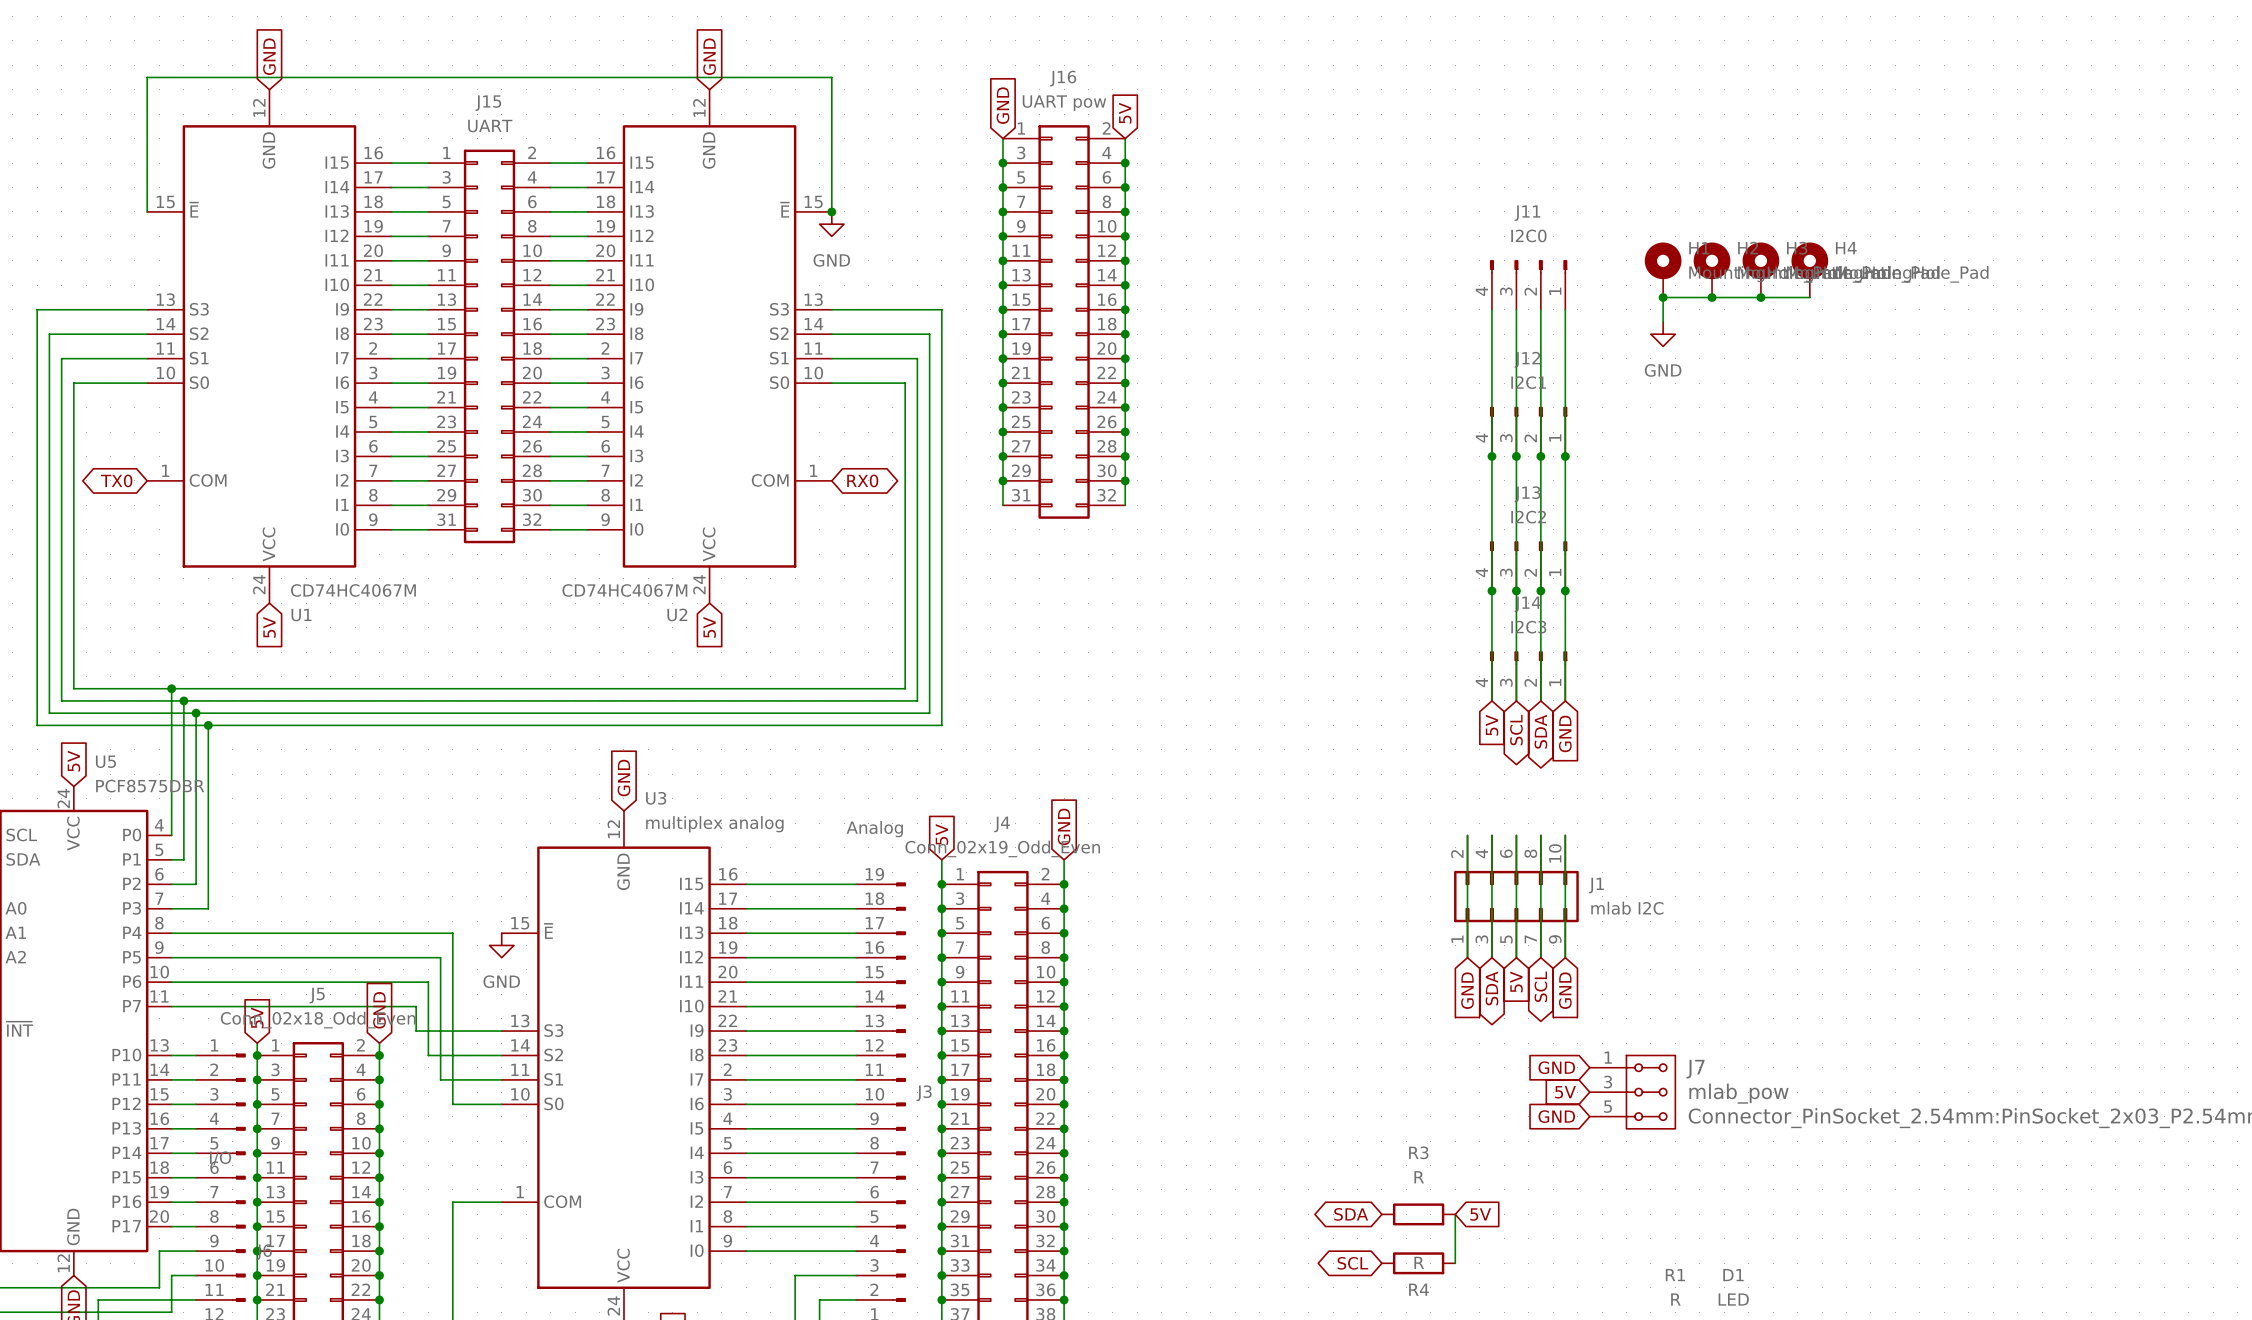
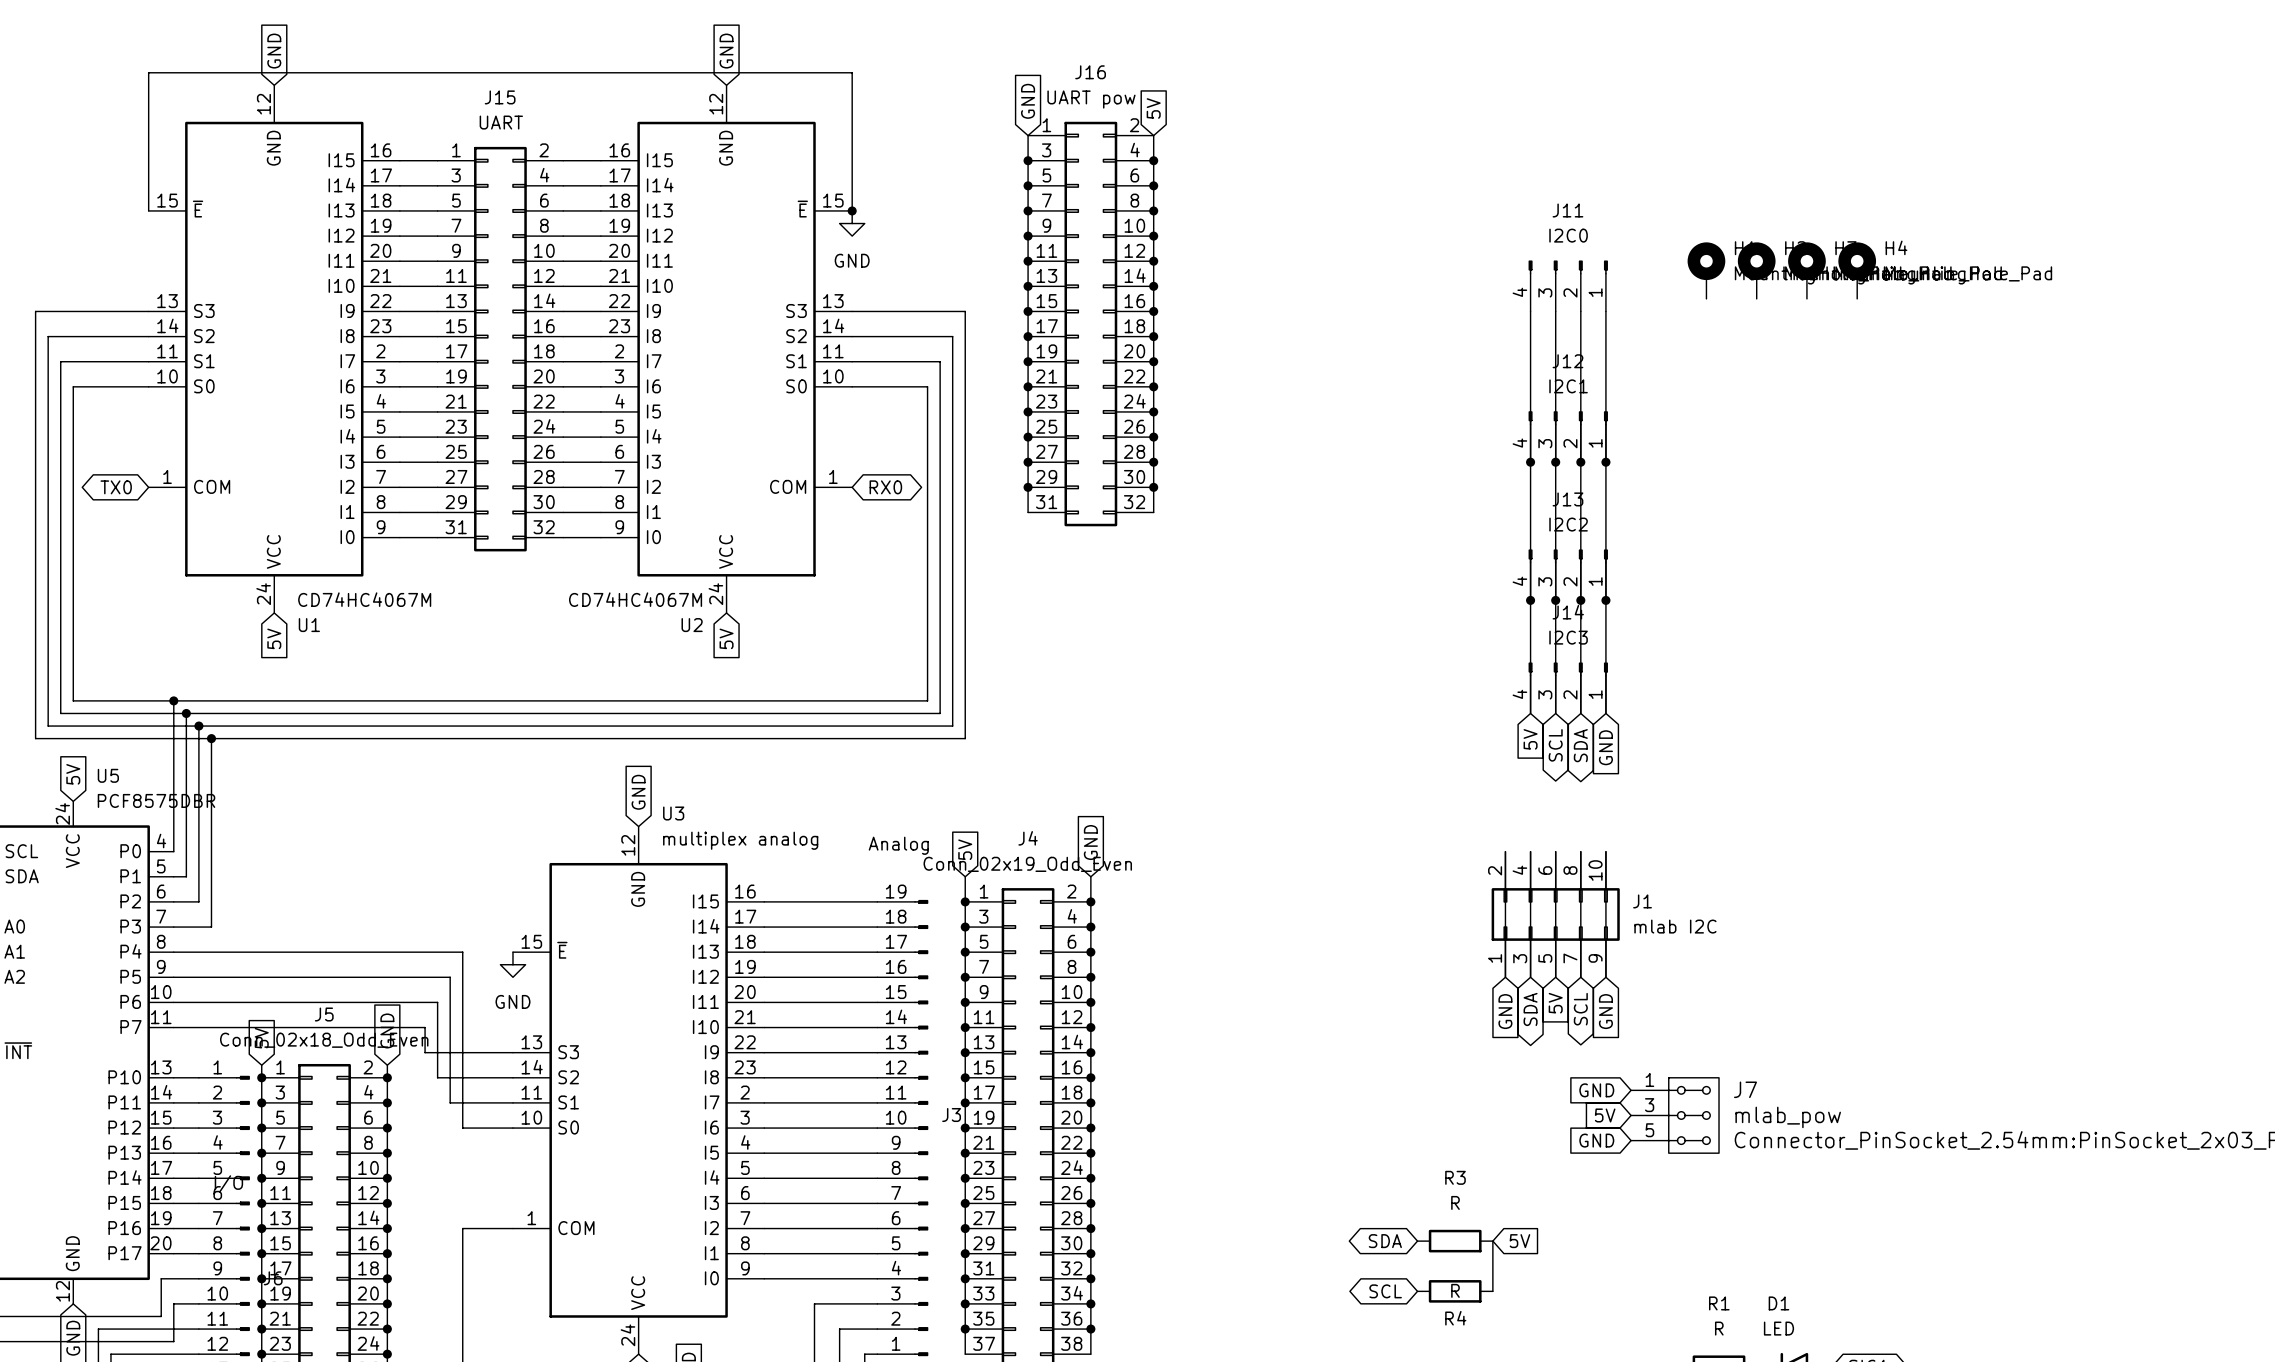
junction: (1663, 297) -> none
junction: (1712, 297) -> none
junction: (1760, 297) -> none
wire: (1809, 297) (1663, 297) (1663, 321) -> none
power symbol: GND (1663, 334) -> none

